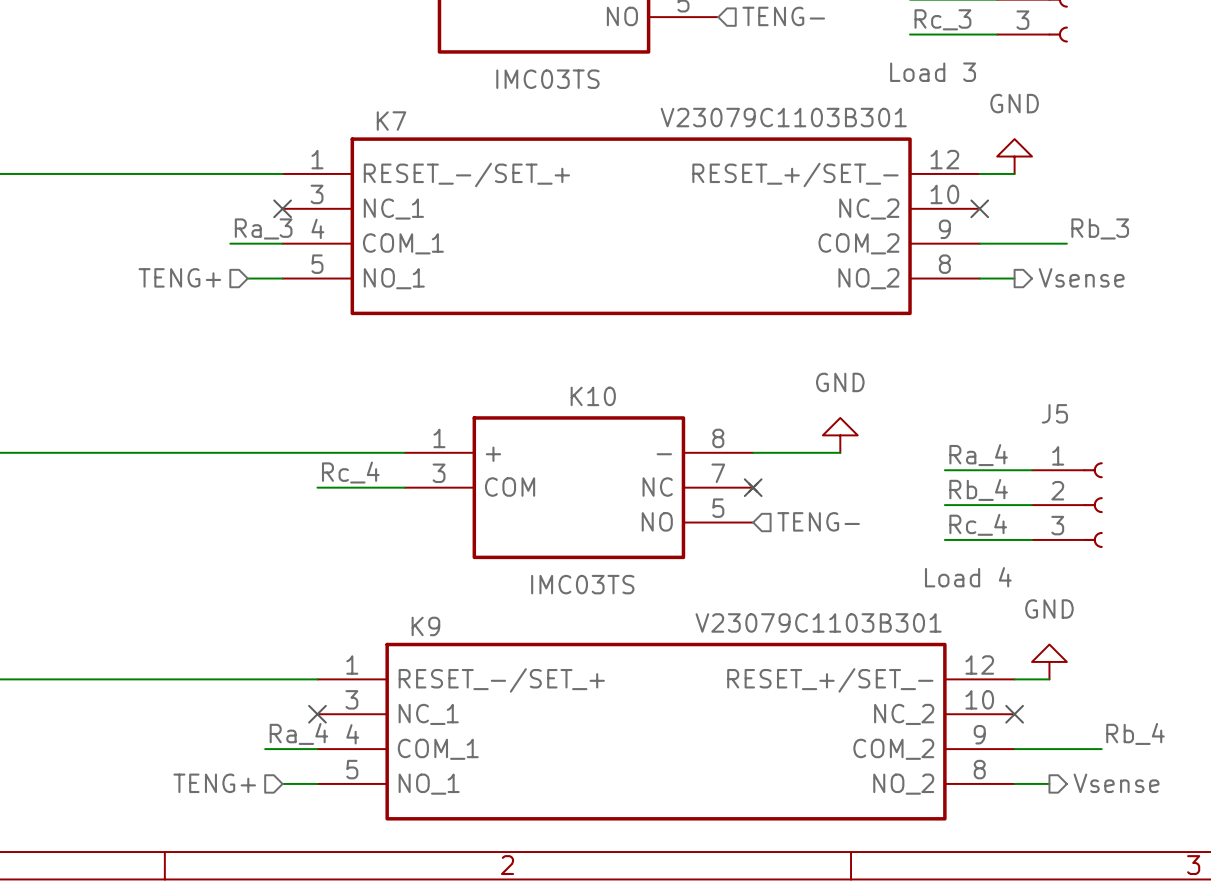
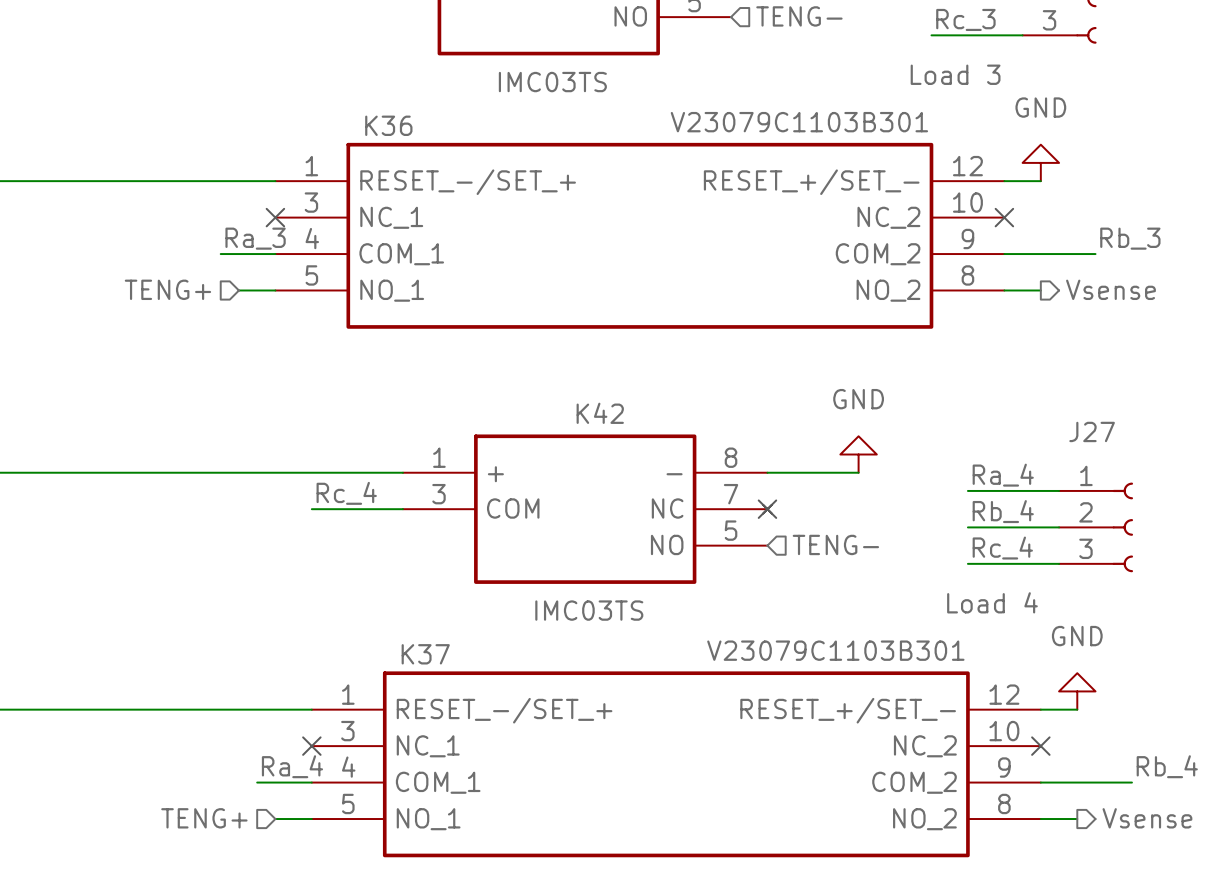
K7 name: K7 (391, 121) -> K36 (388, 125)
K10 name: K10 (593, 396) -> K42 (600, 413)
J5 name: J5 (1054, 413) -> J27 (1092, 431)
K9 name: K9 (425, 626) -> K37 (425, 654)

